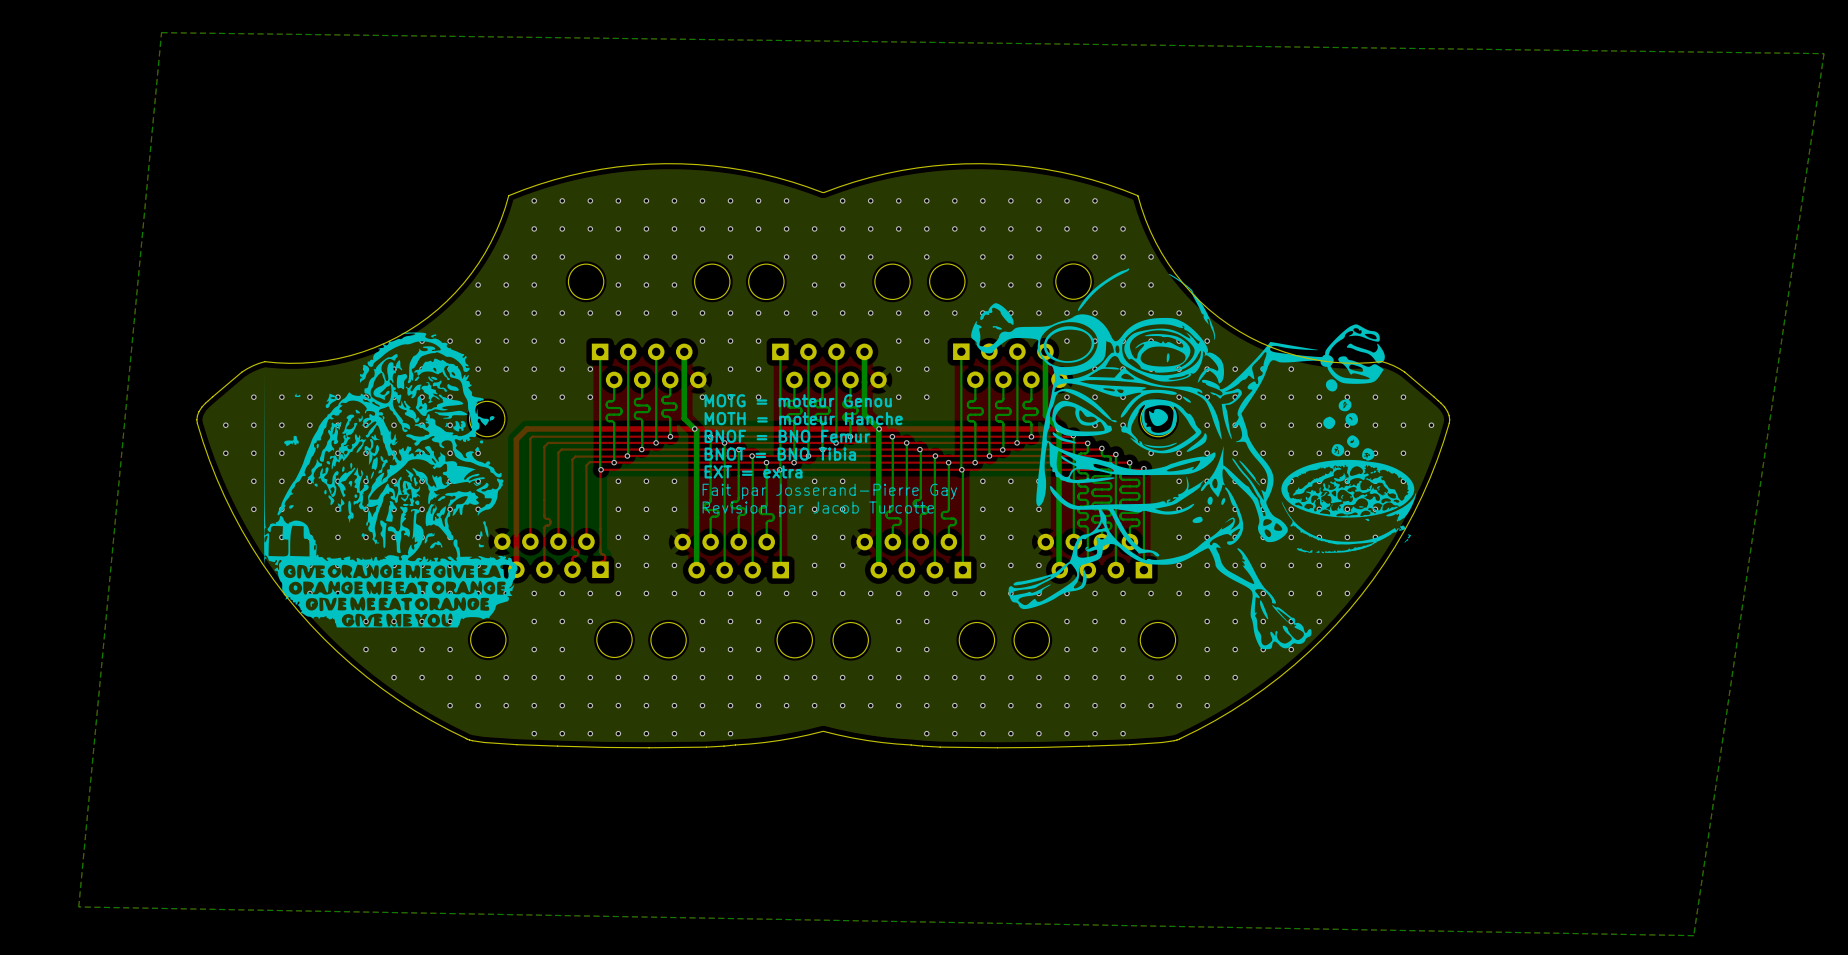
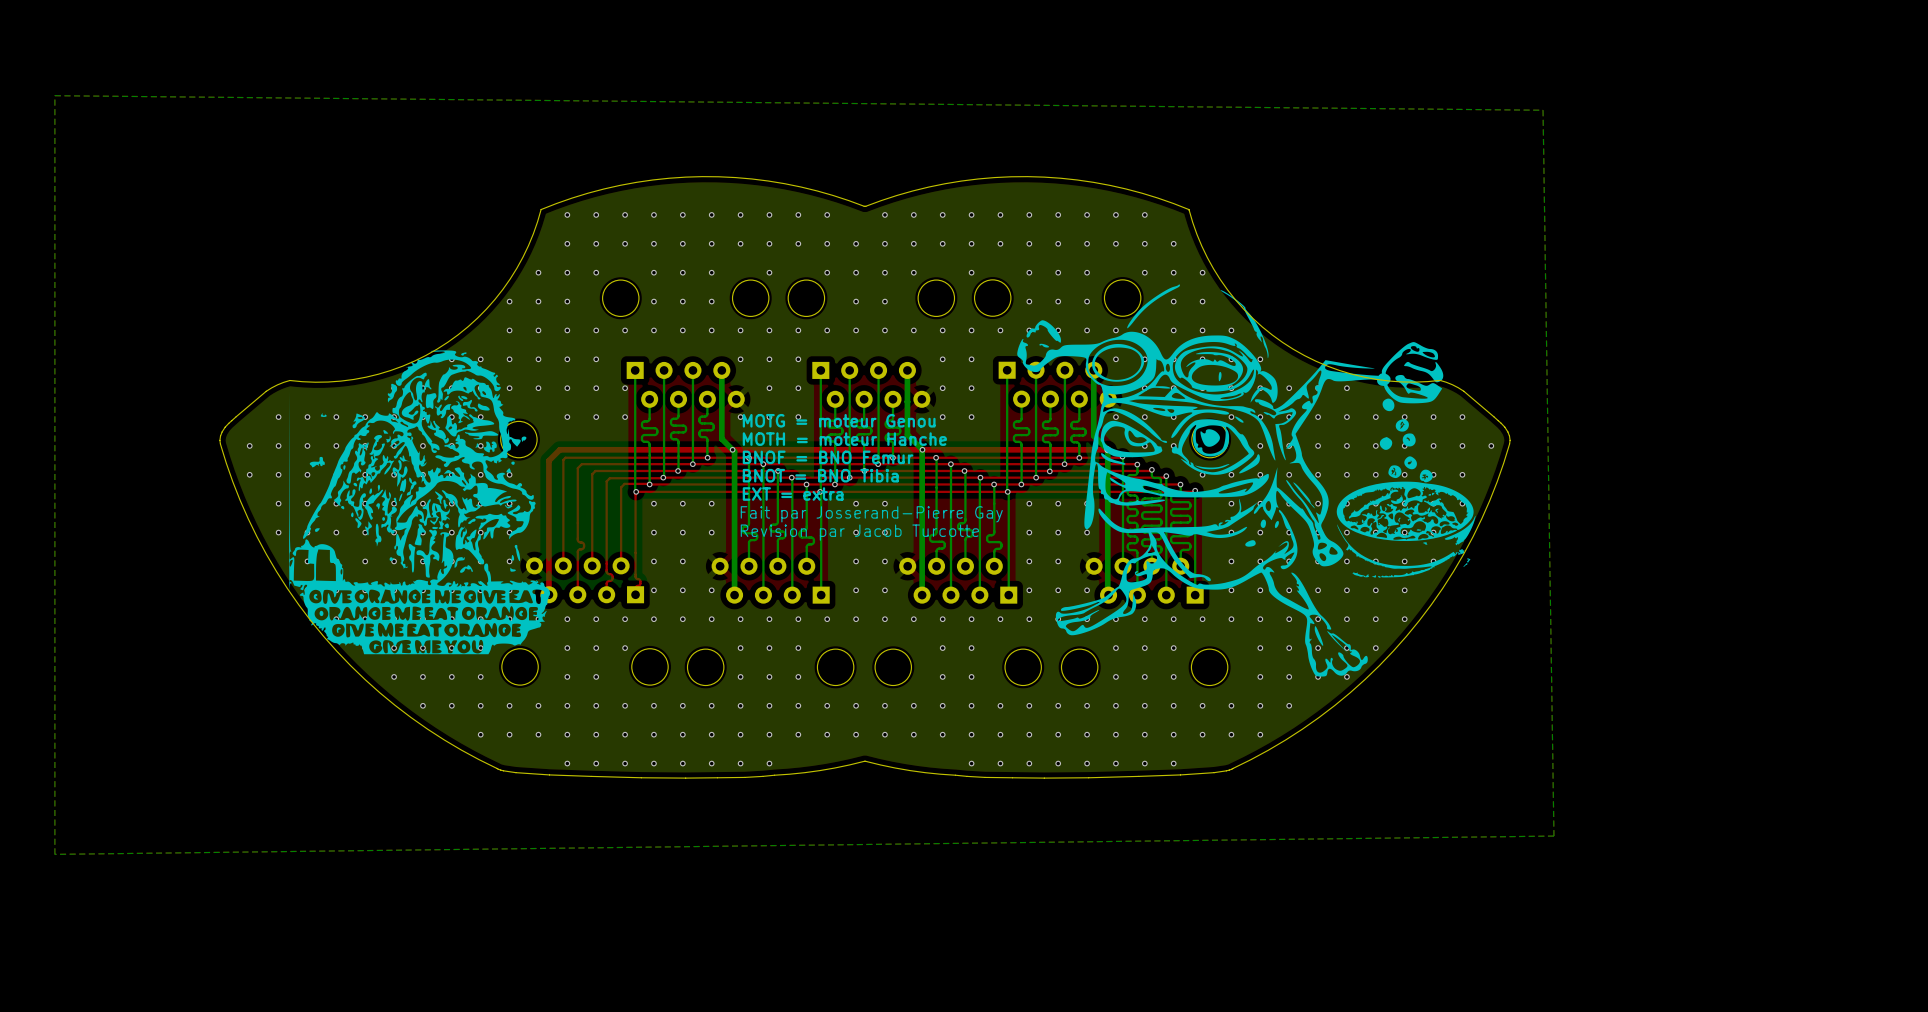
bottom zone outline: (161, 32) (1824, 53) (1693, 935) (78, 906) (161, 32) -> (54, 95) (1543, 110) (1553, 836) (54, 854) (54, 95)

